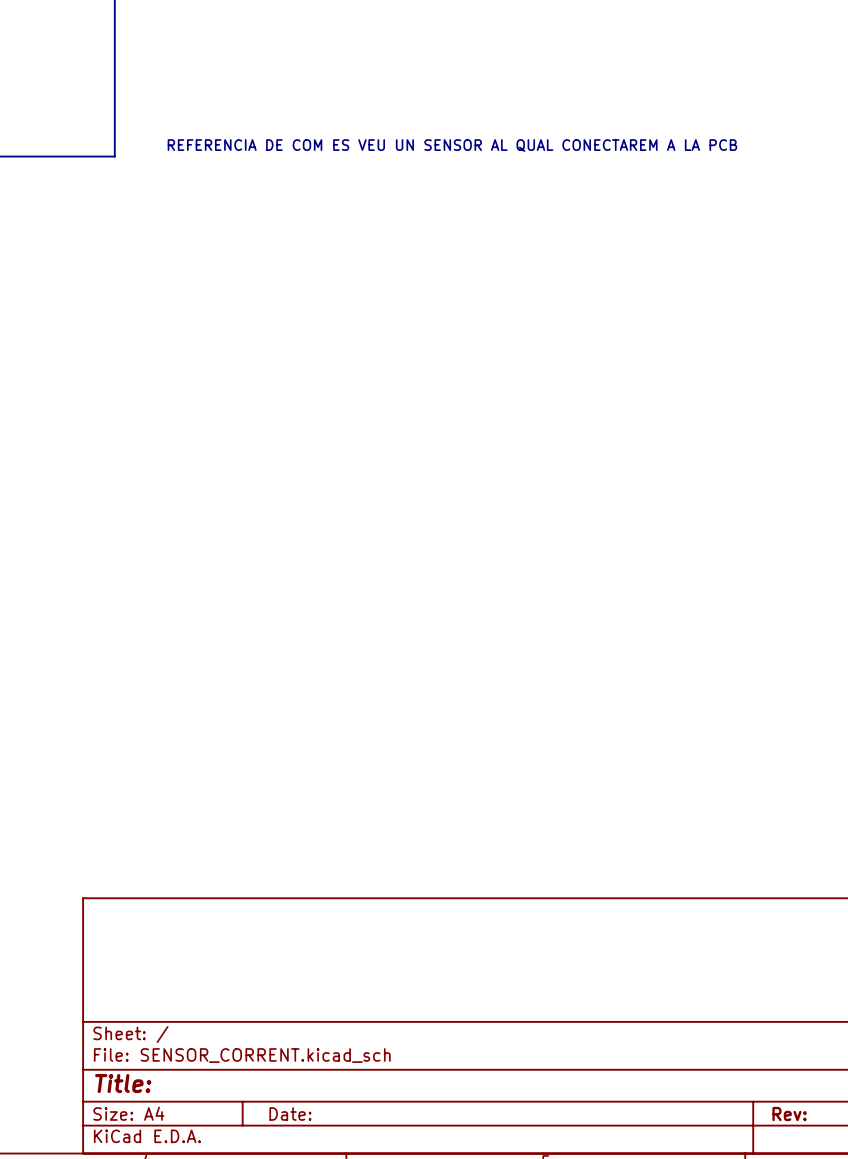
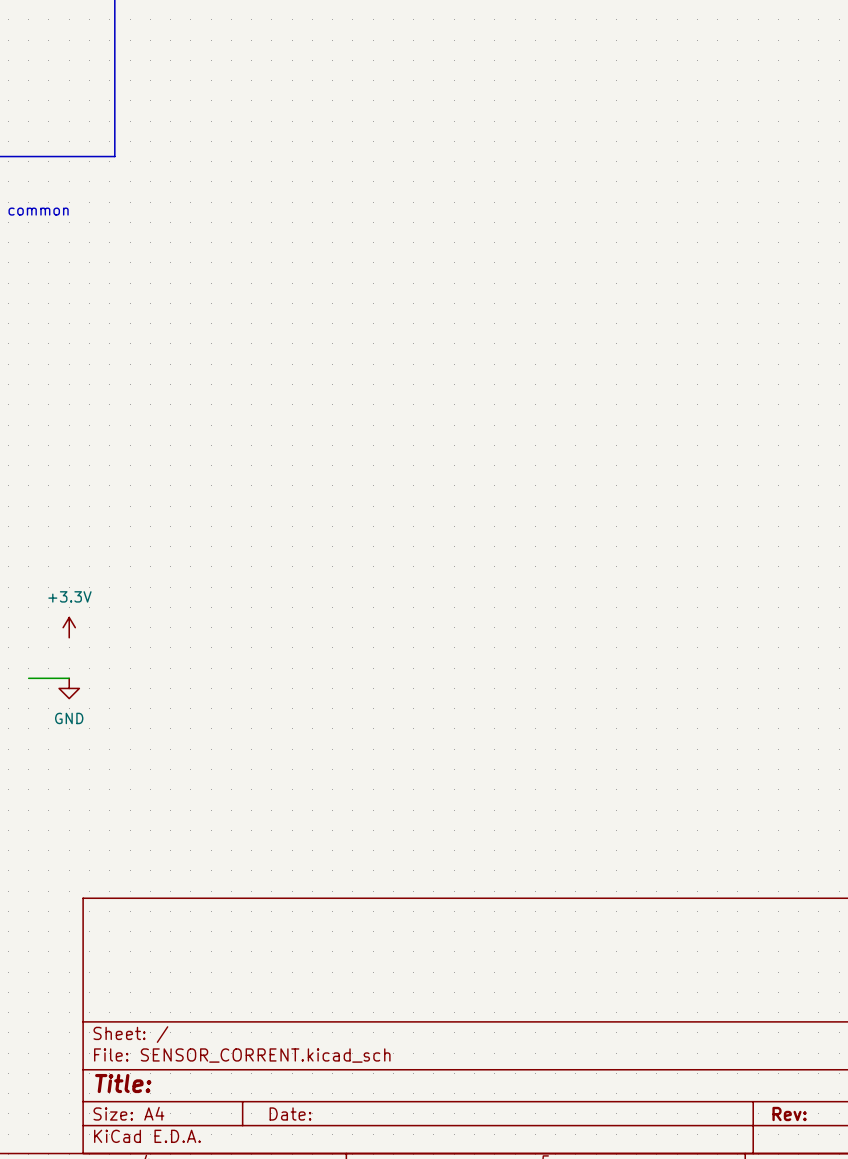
text: REFERENCIA DE COM ES VEU UN SENSOR AL QUAL CONECTAREM A LA PCB (452, 145) -> none
text: none -> common (38, 211)
power symbol: none -> +3.3V (69, 627)
wire: none -> (28, 678) (69, 678)
power symbol: none -> GND (69, 688)

